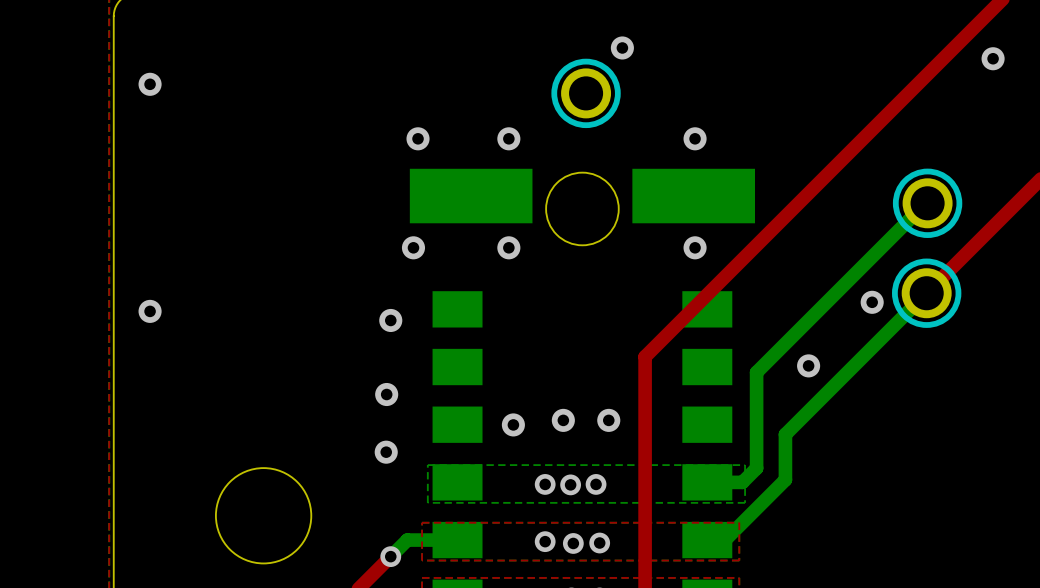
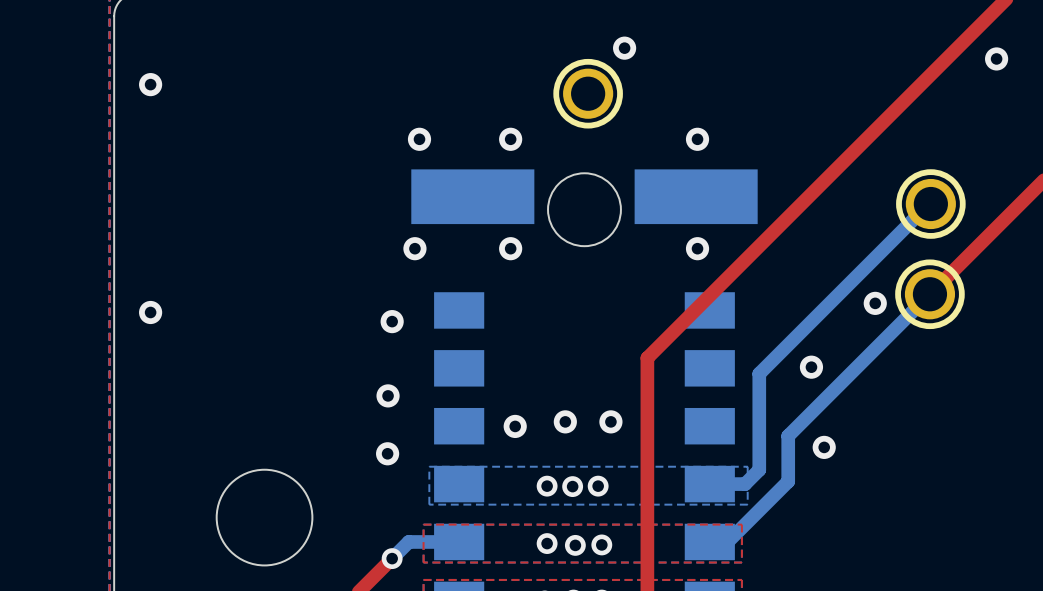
via: none -> (824, 447)

